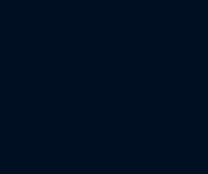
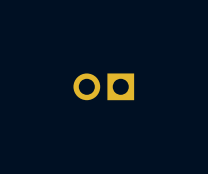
part: none -> (103, 86)

